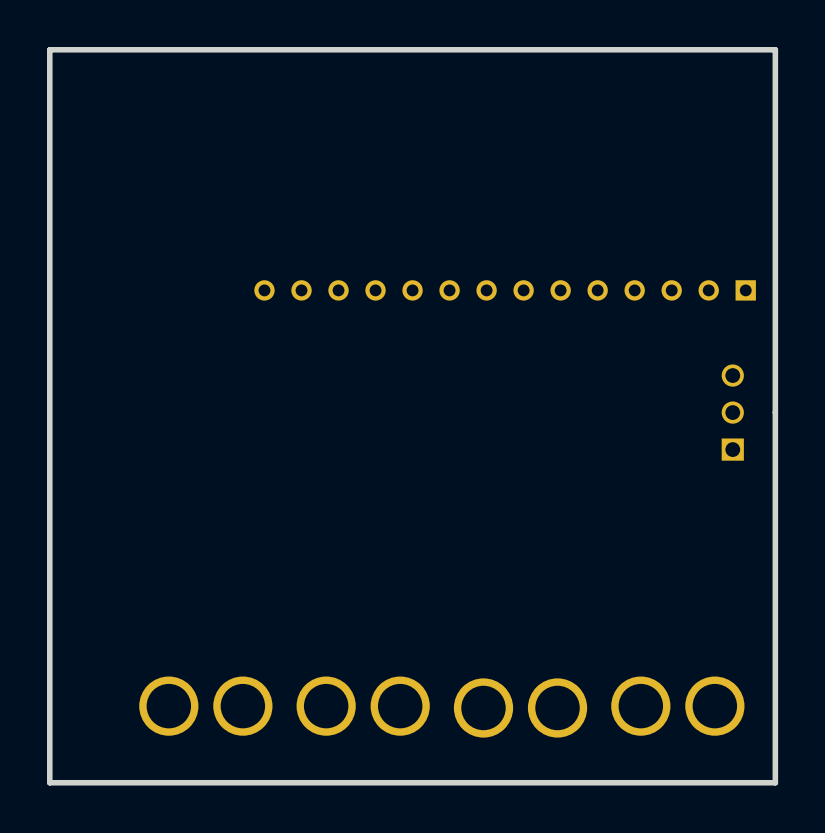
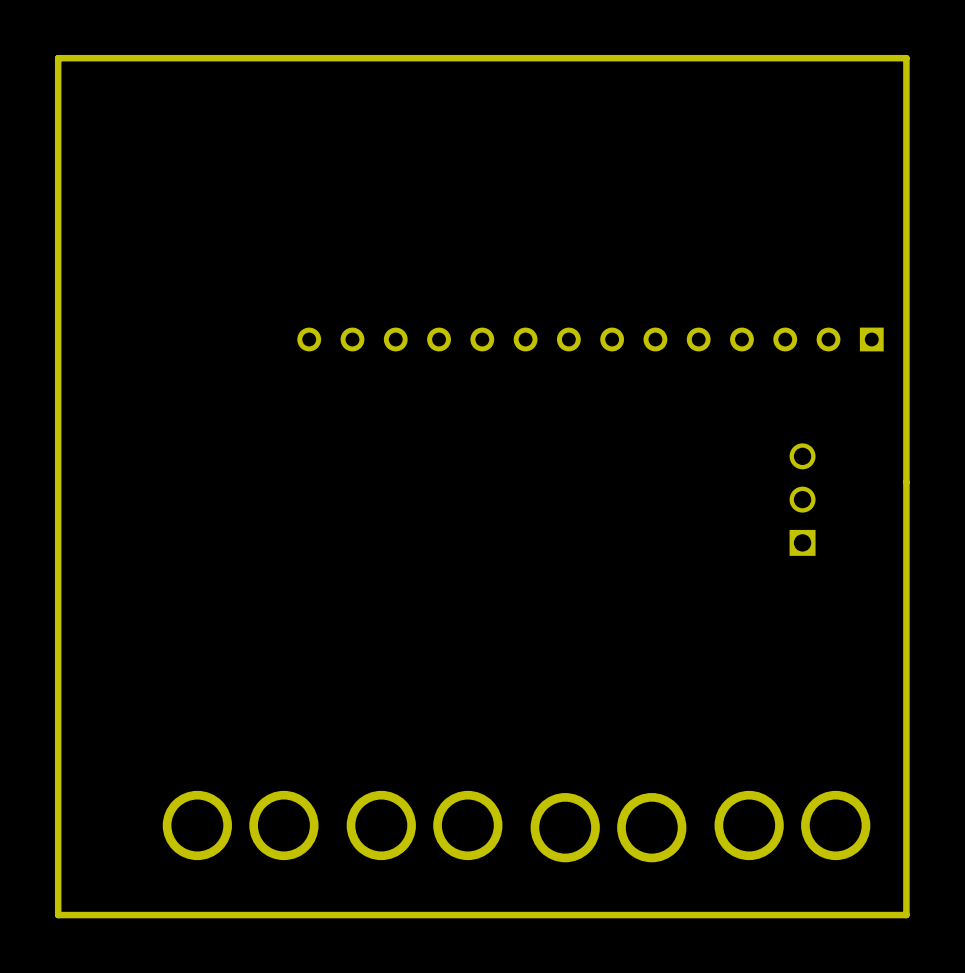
part position: (732, 412) -> (802, 499)

